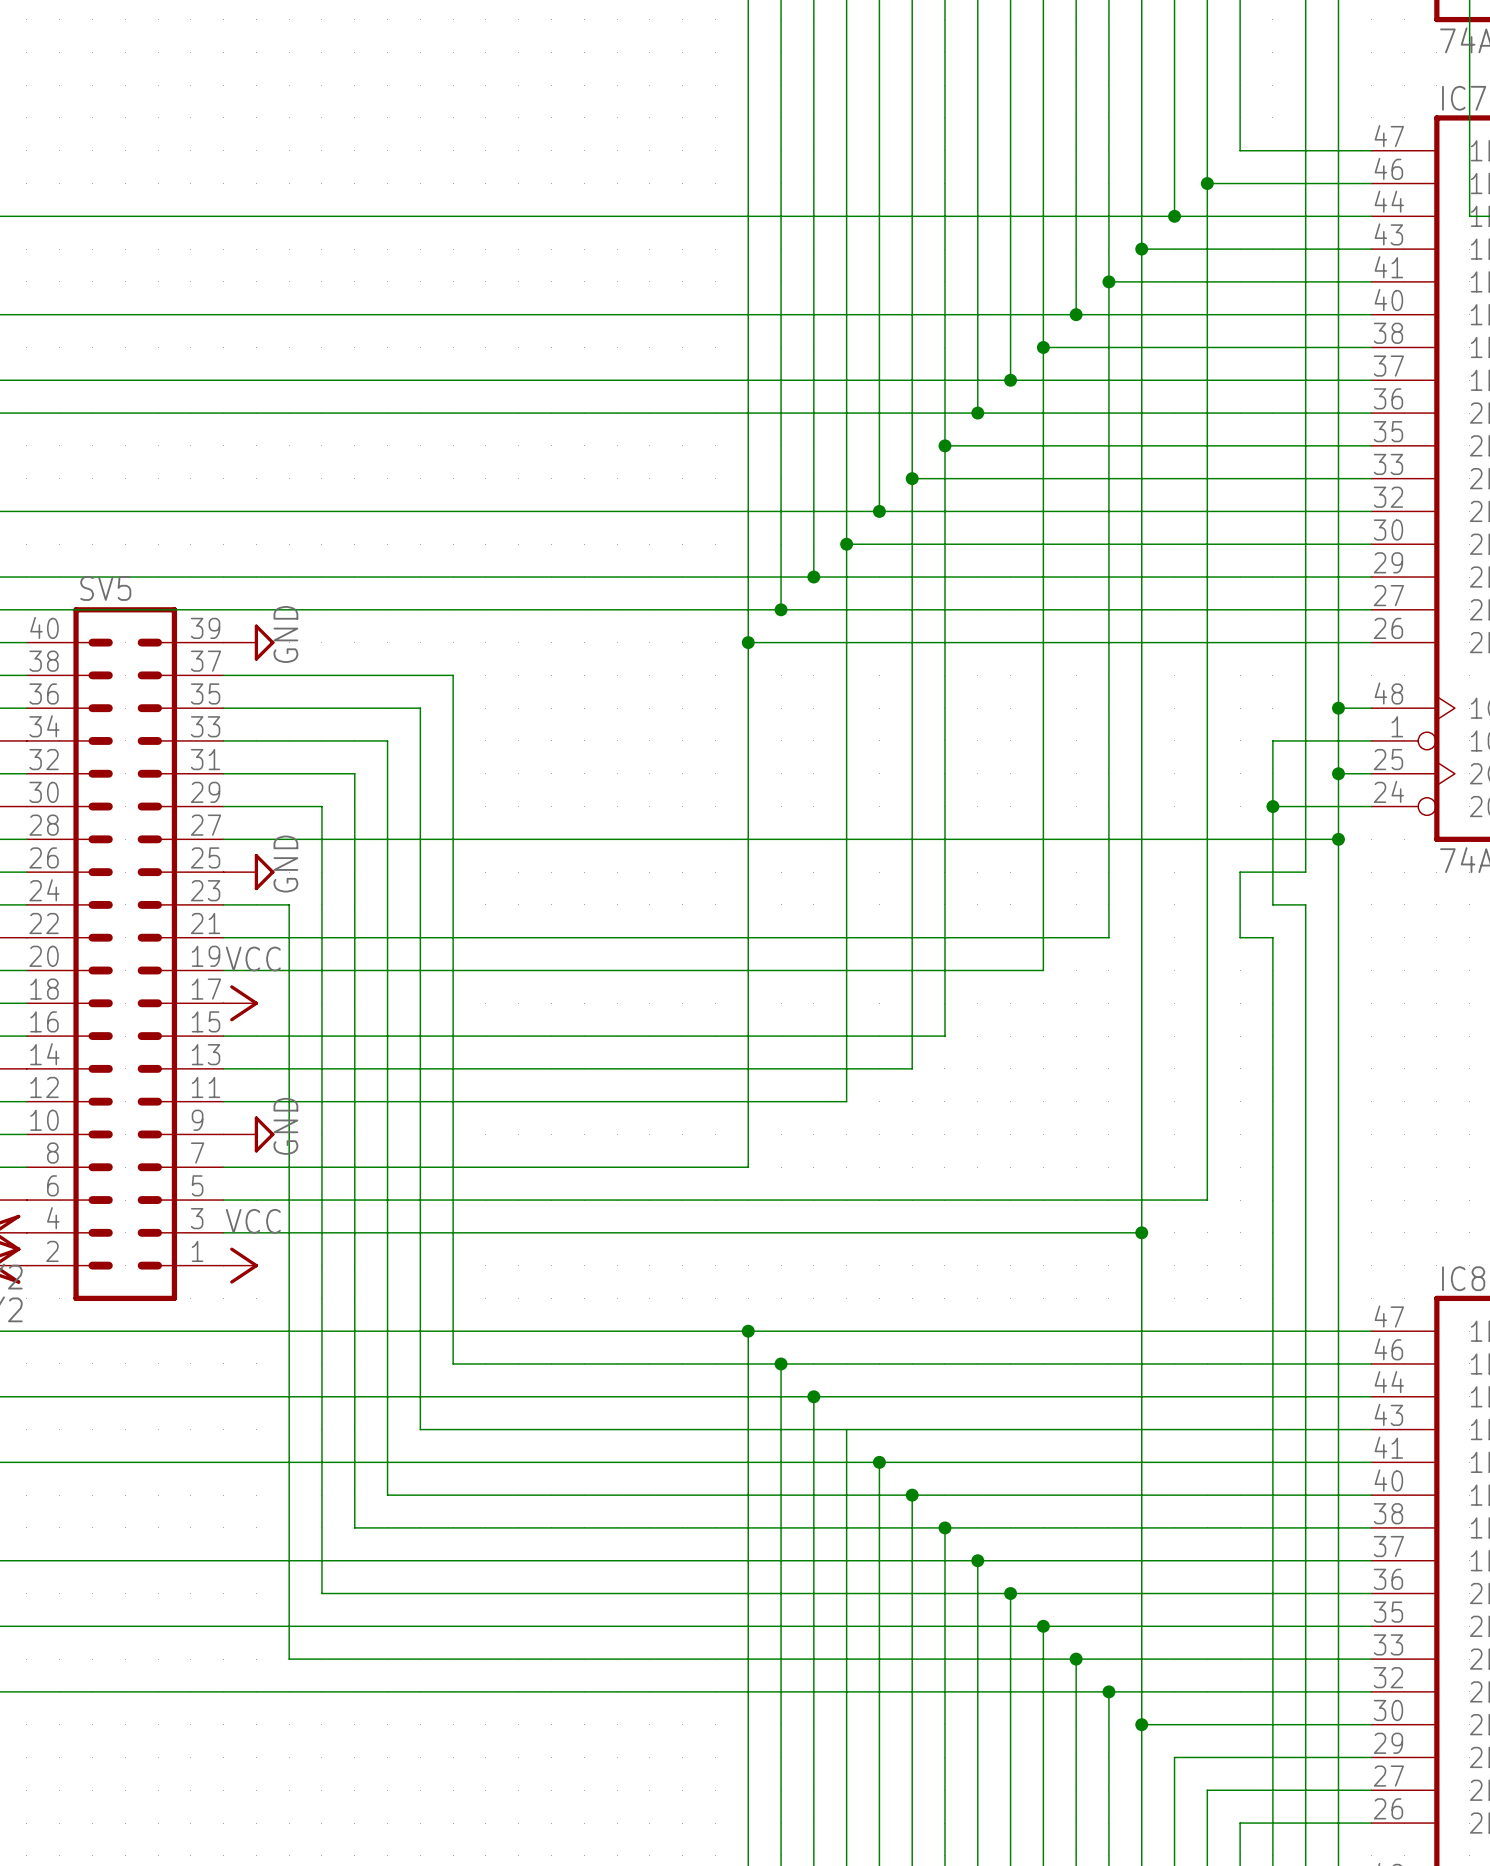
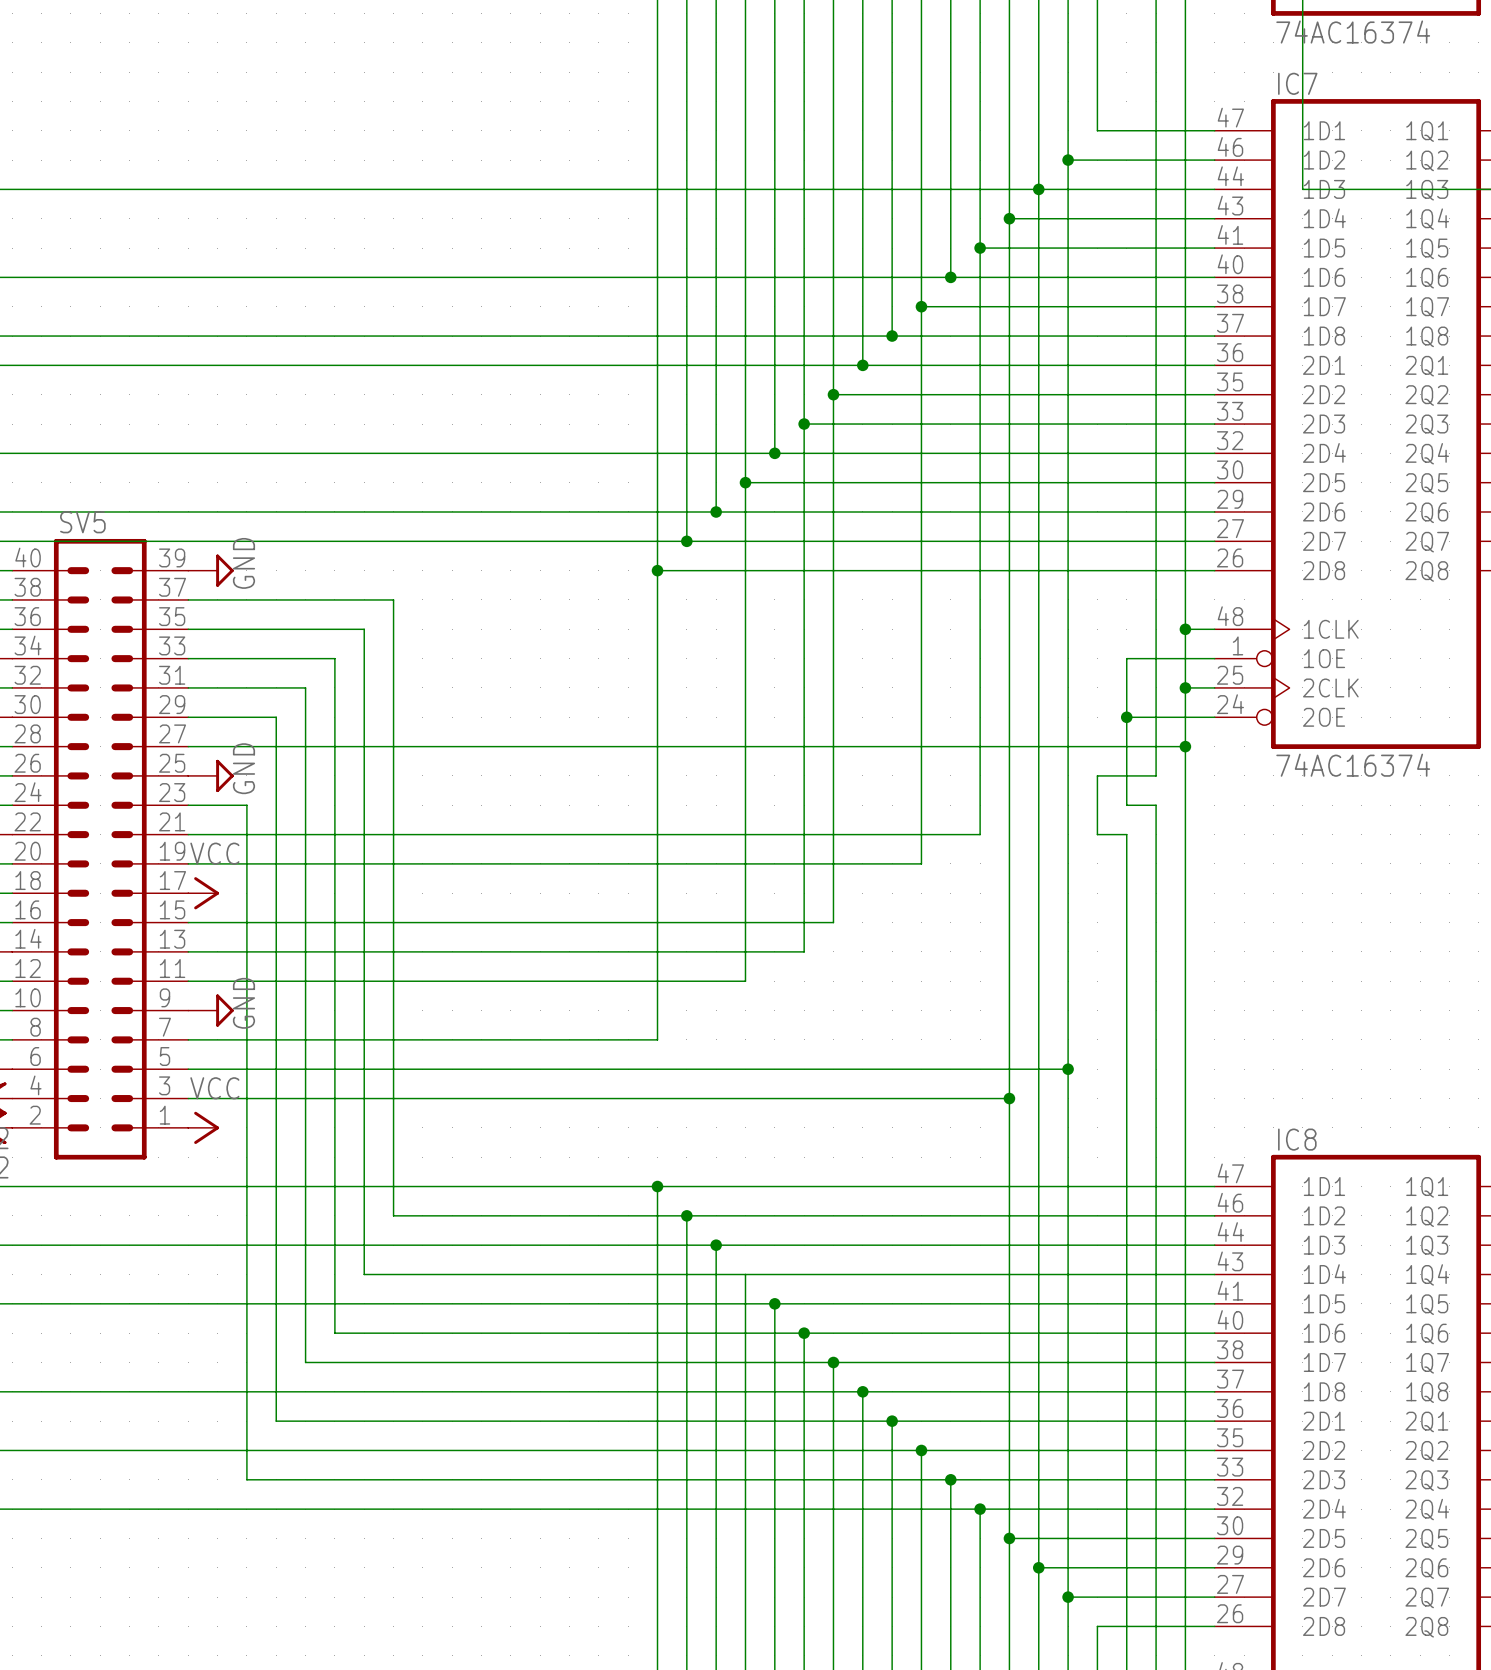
wire: none -> (1038, 189) (1038, 1567)
wire: none -> (1068, 1069) (1068, 1597)
junction: none -> (1068, 1069)
junction: none -> (1038, 1567)
junction: none -> (1068, 1597)

